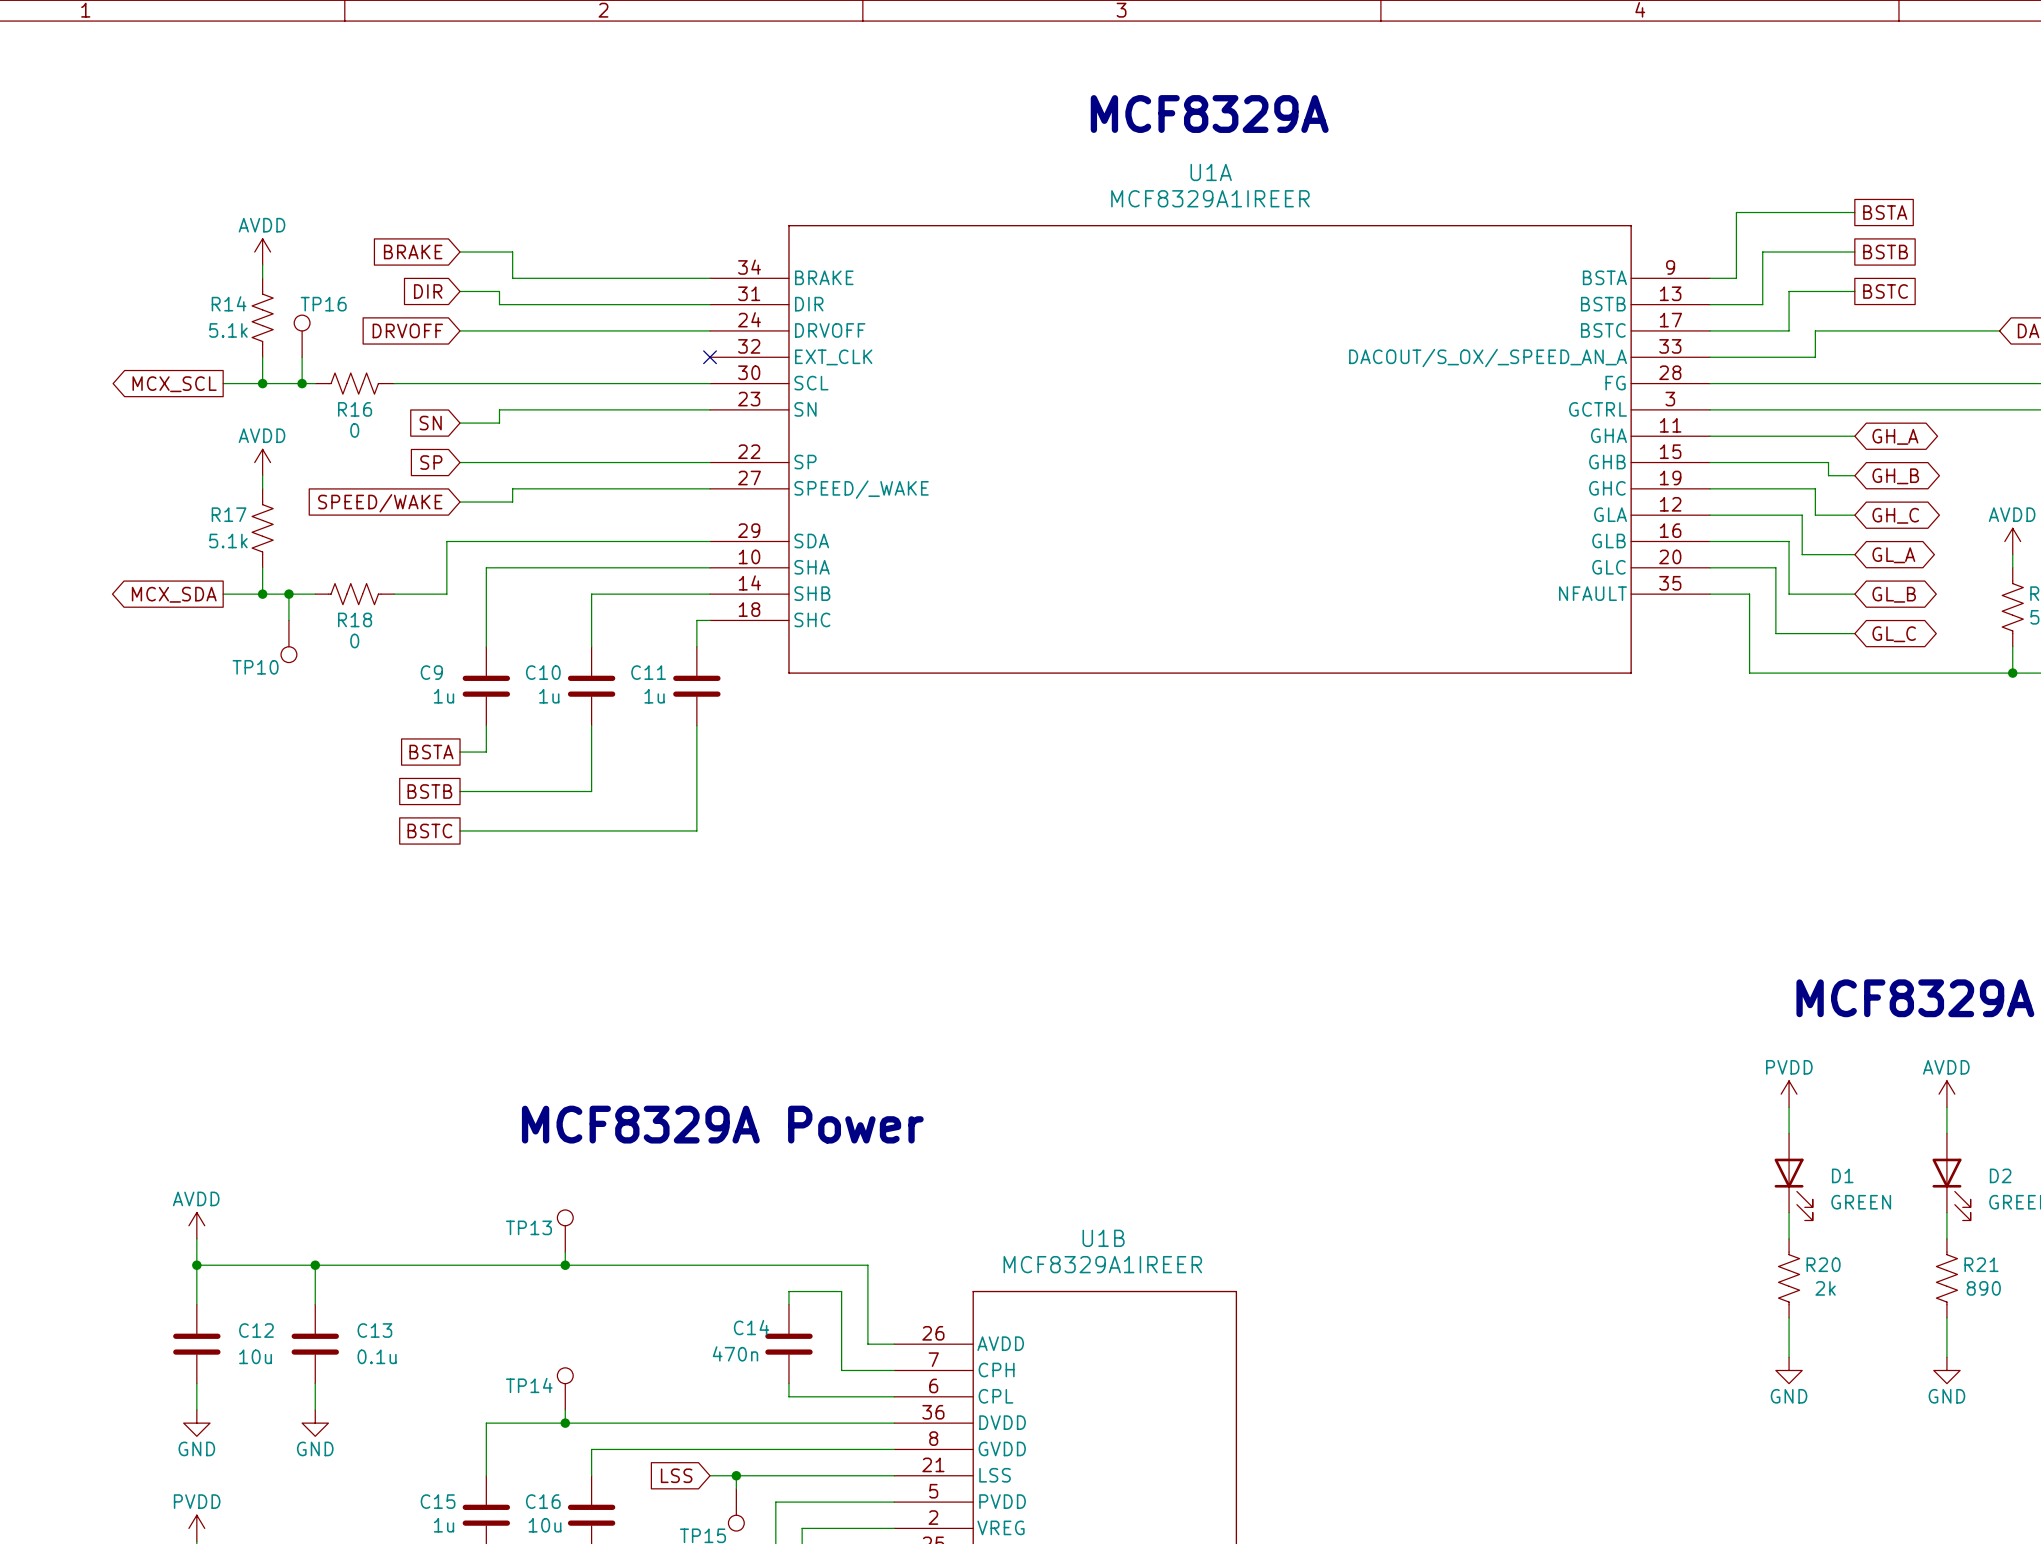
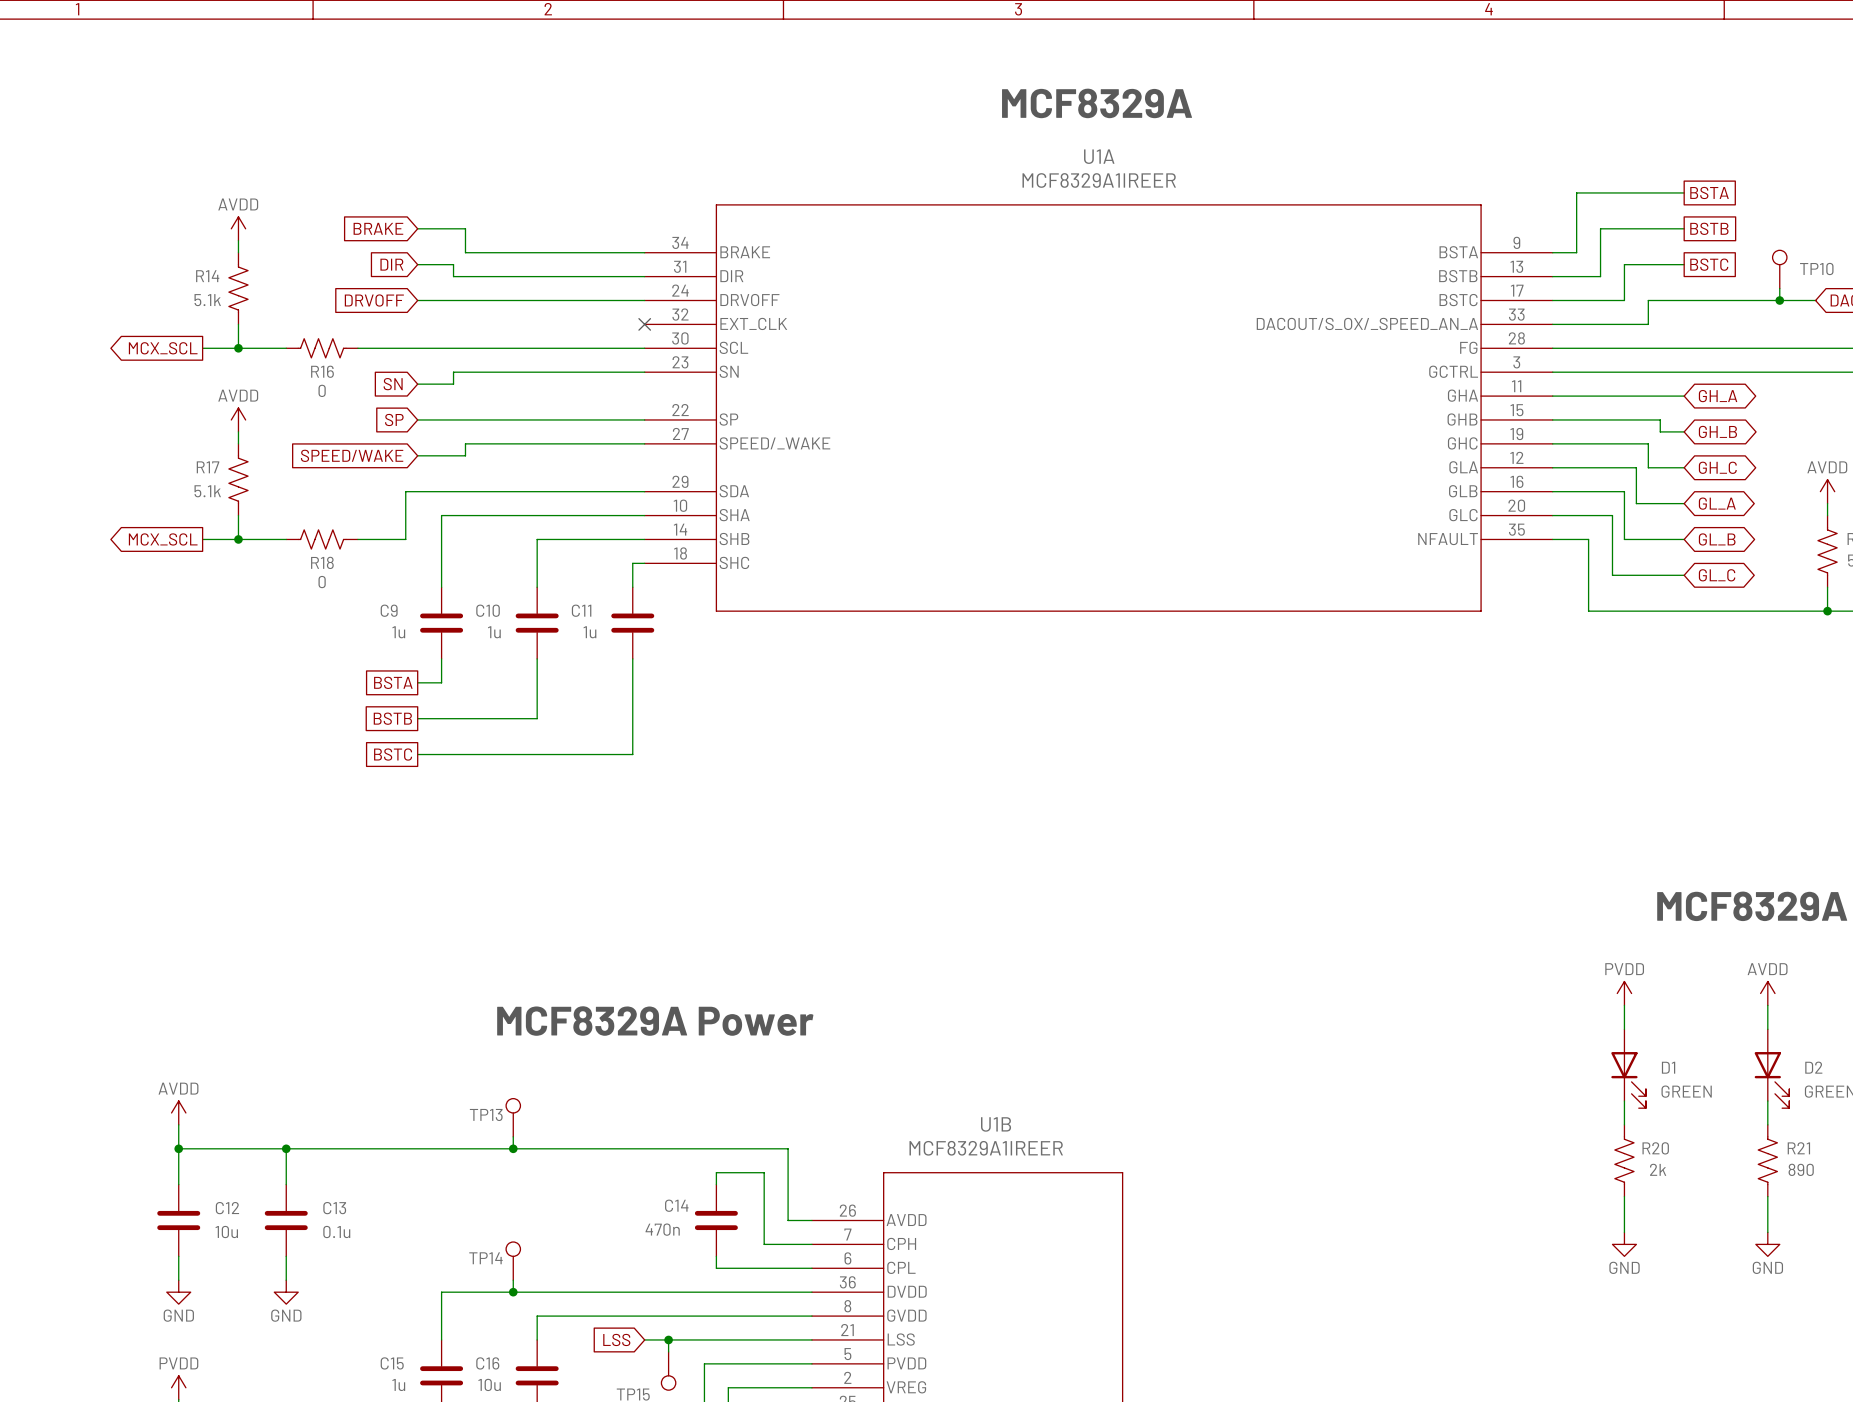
wire: none -> (1779, 288) (1779, 300)
junction: none -> (1779, 300)
TP16: (302, 336) -> none
wire: (302, 357) (302, 383) -> none
junction: (302, 383) -> none
global label: MCX_SDA (174, 594) -> MCX_SCL (163, 539)
wire: (288, 594) (288, 620) -> none
junction: (288, 594) -> none
TP10 position: (288, 641) -> (1779, 269)
TP10 rotation: 0° (288, 654) -> 180° (1779, 257)
TP10 name position: TP10 (255, 667) -> TP10 (1816, 269)

